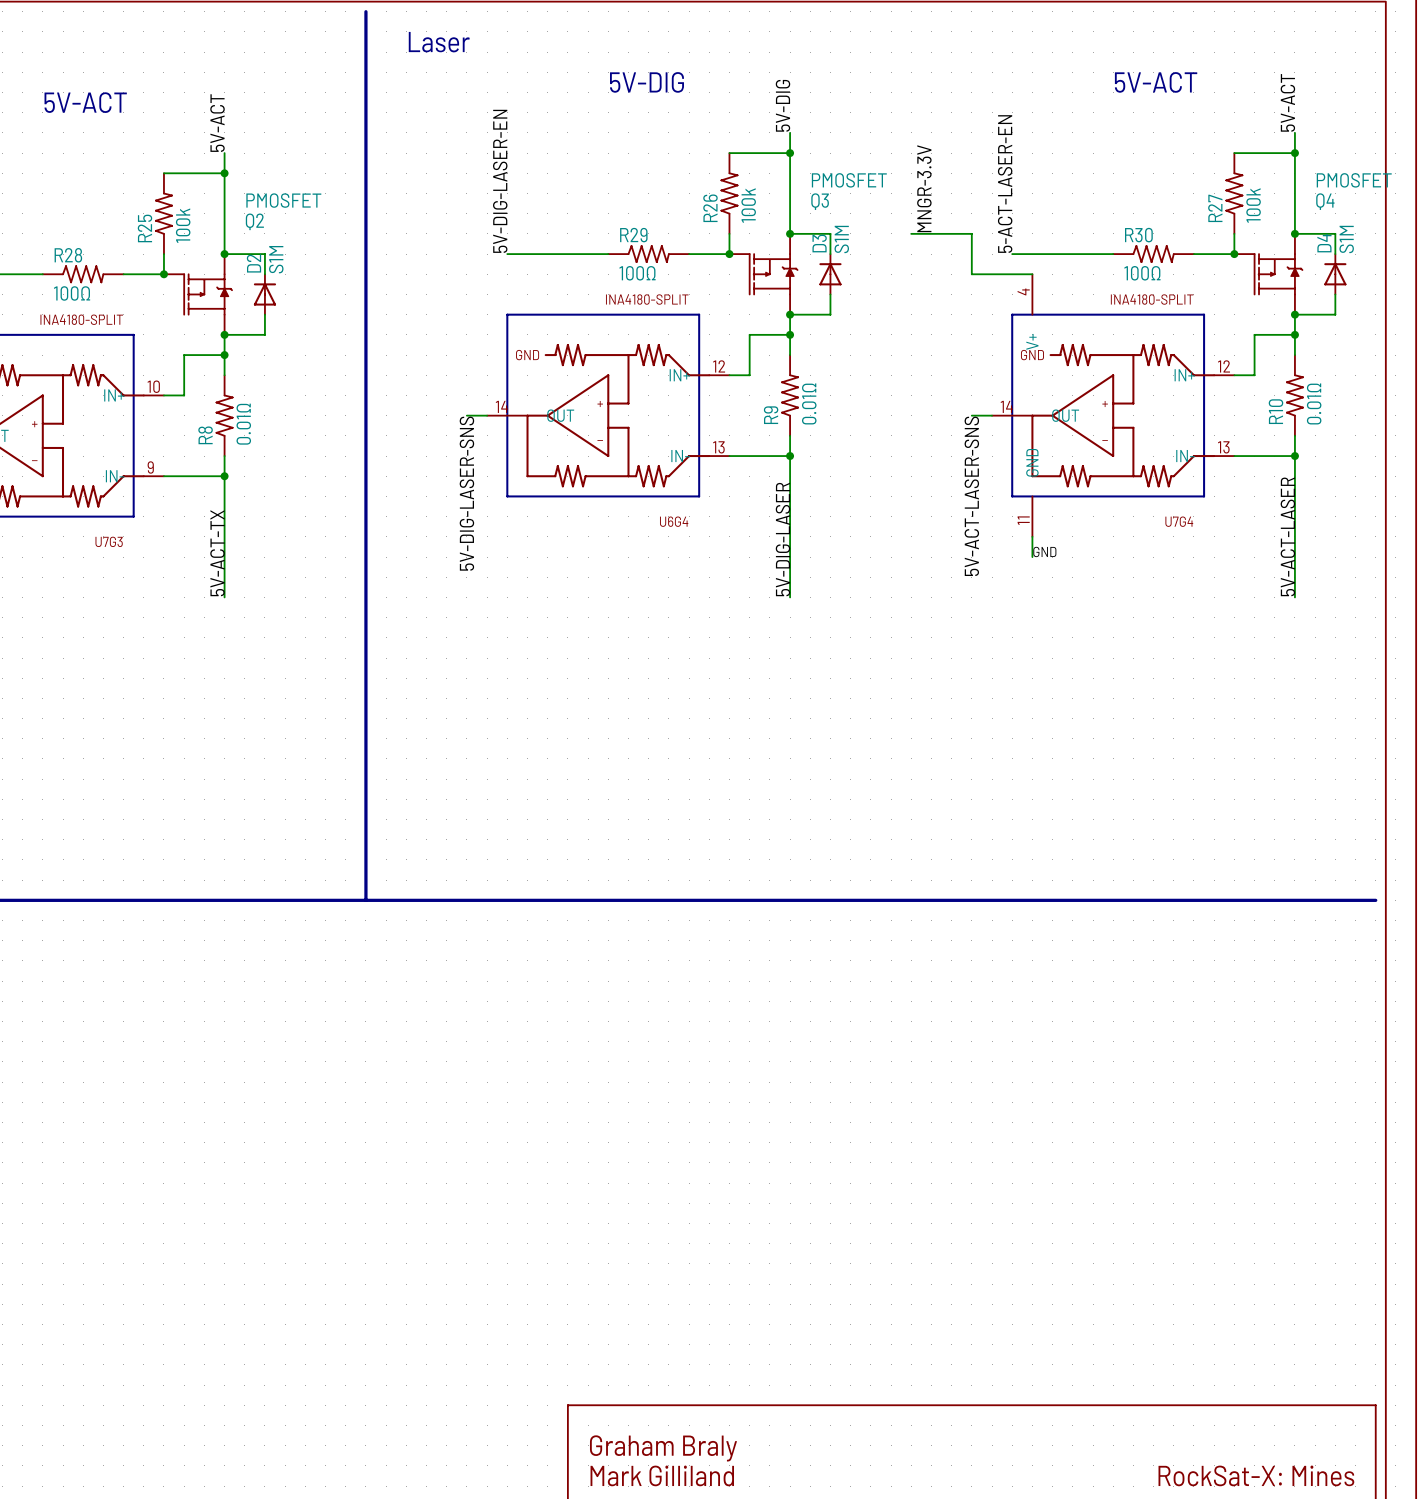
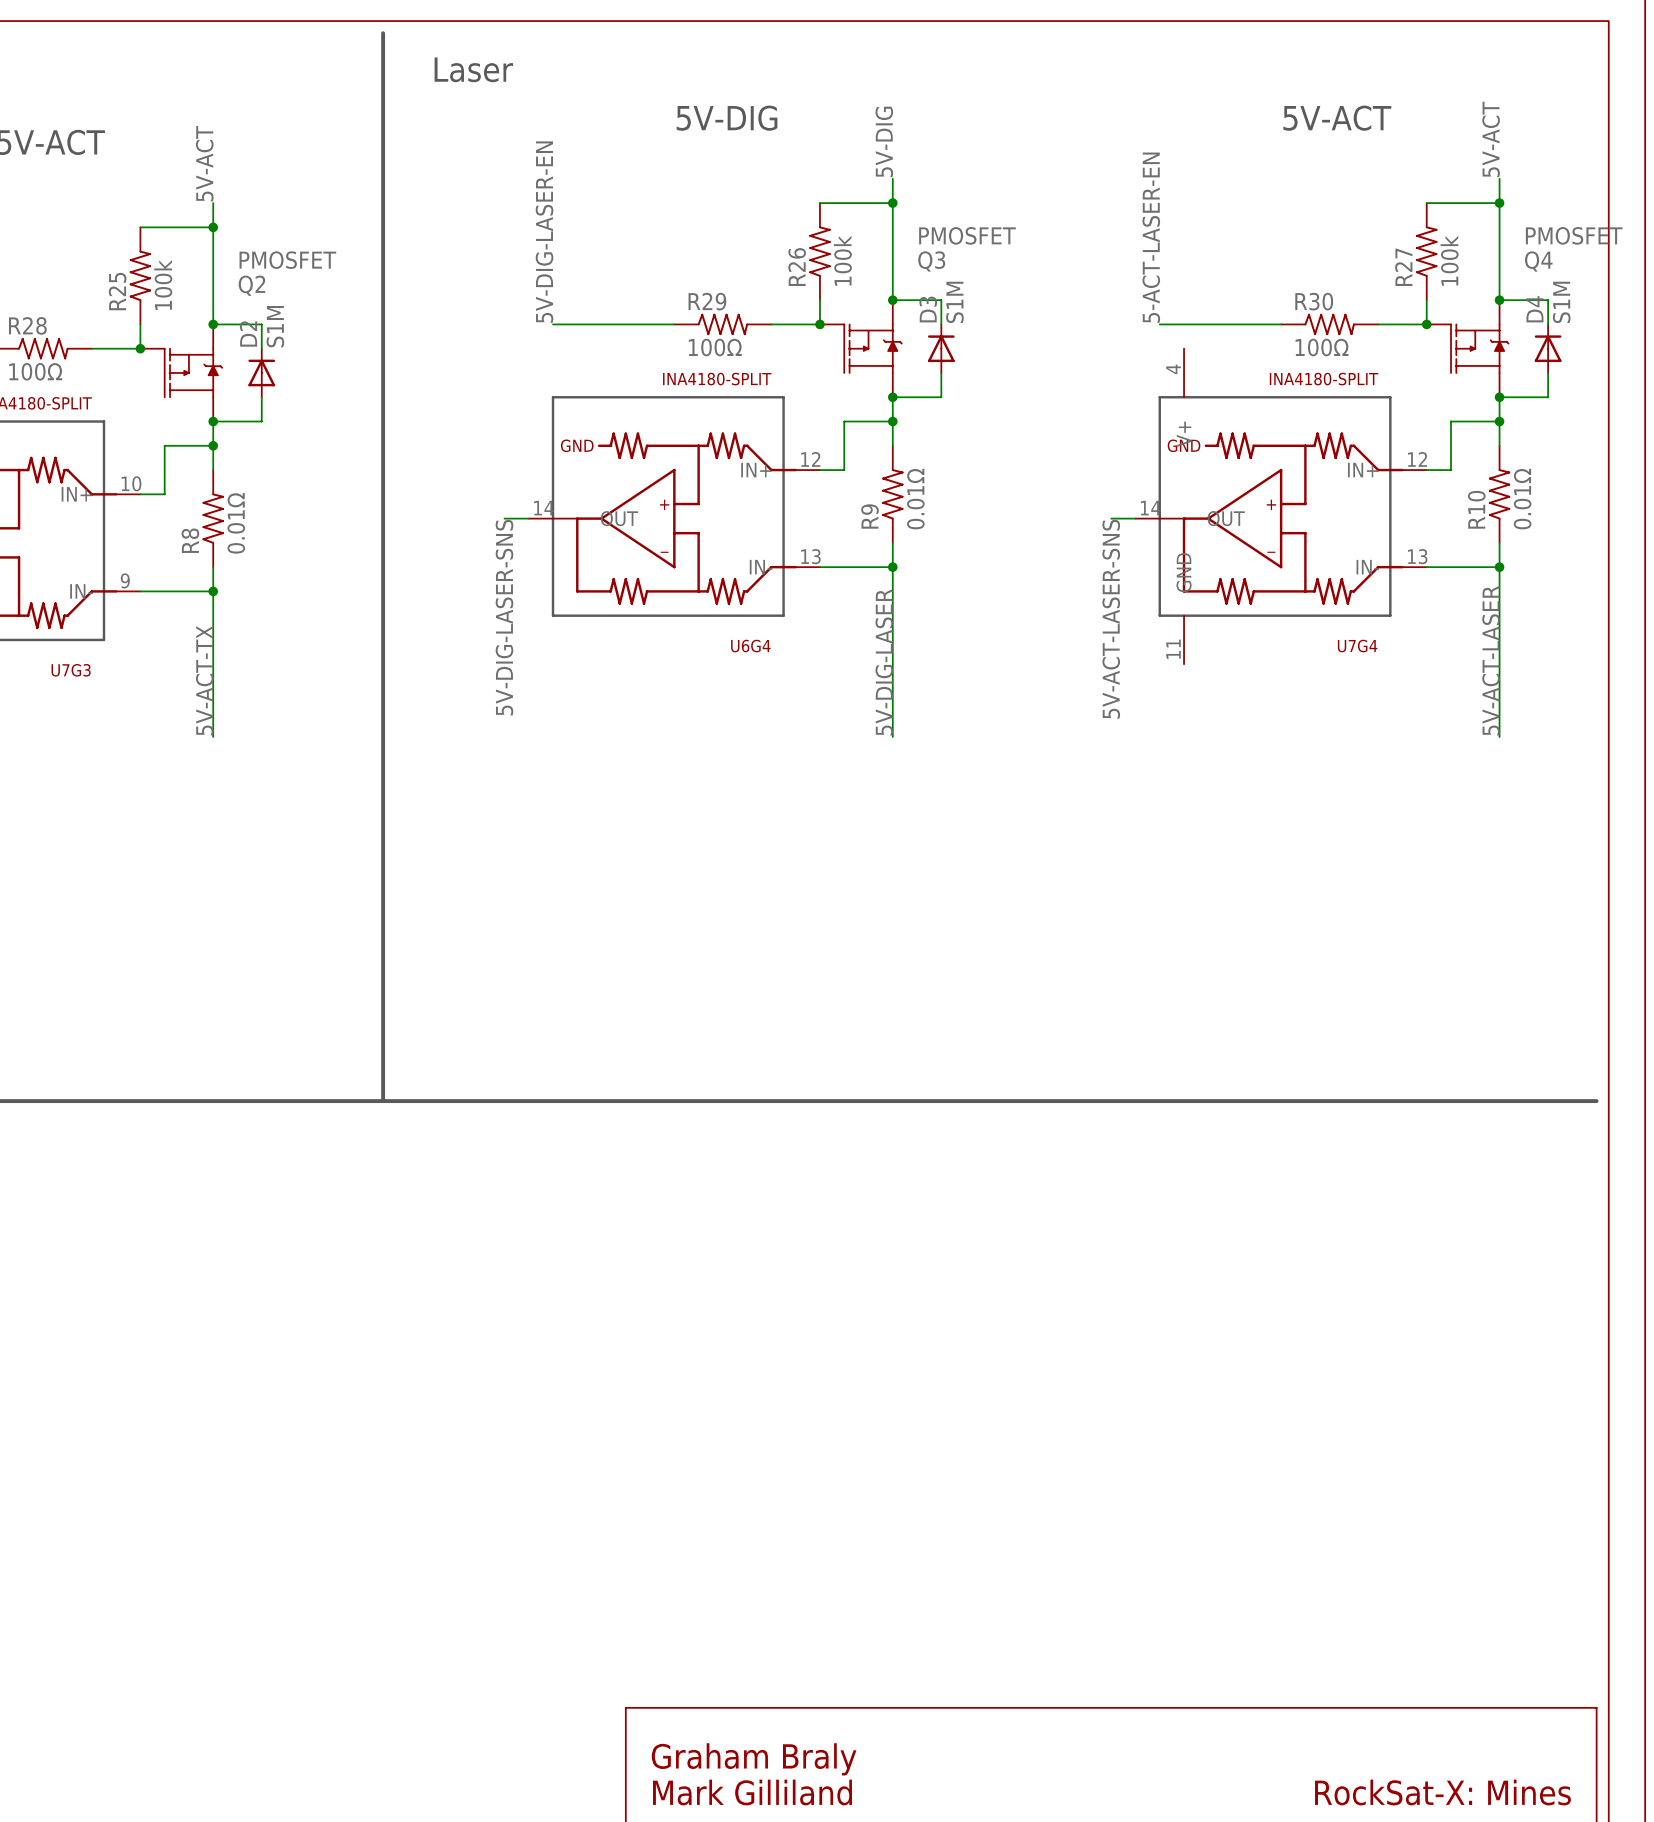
label: MNGR-3.3V (924, 188) -> none
wire: (911, 233) (971, 233) (971, 274) (1032, 274) -> none
wire: (1032, 536) (1032, 557) -> none
label: GND (1044, 551) -> none

